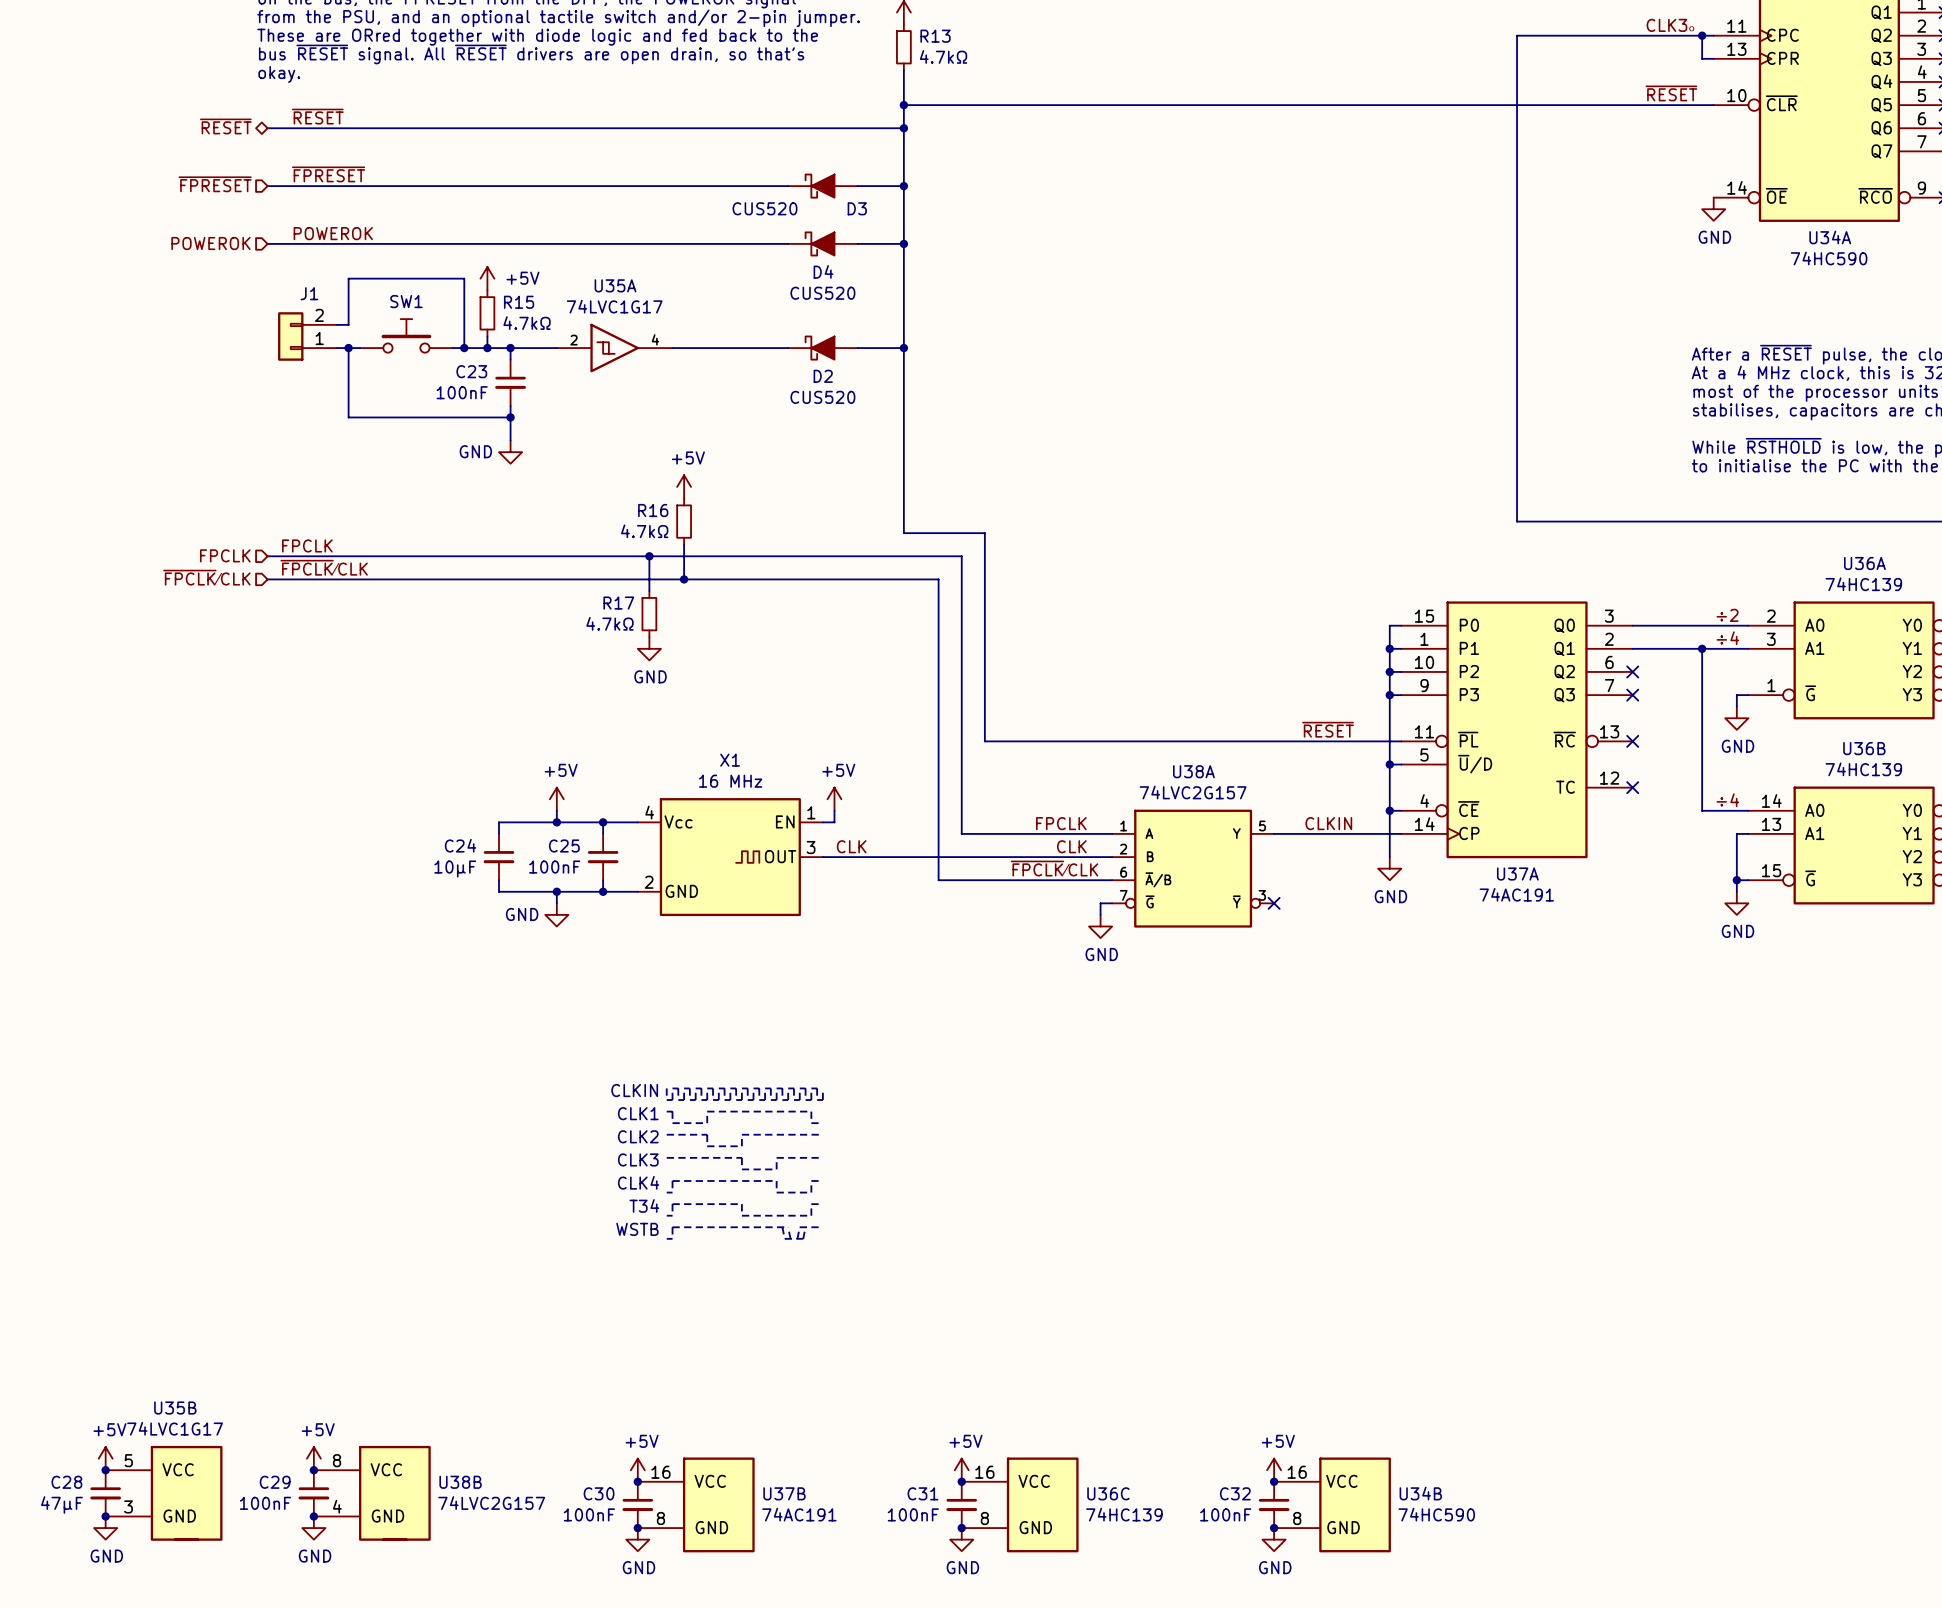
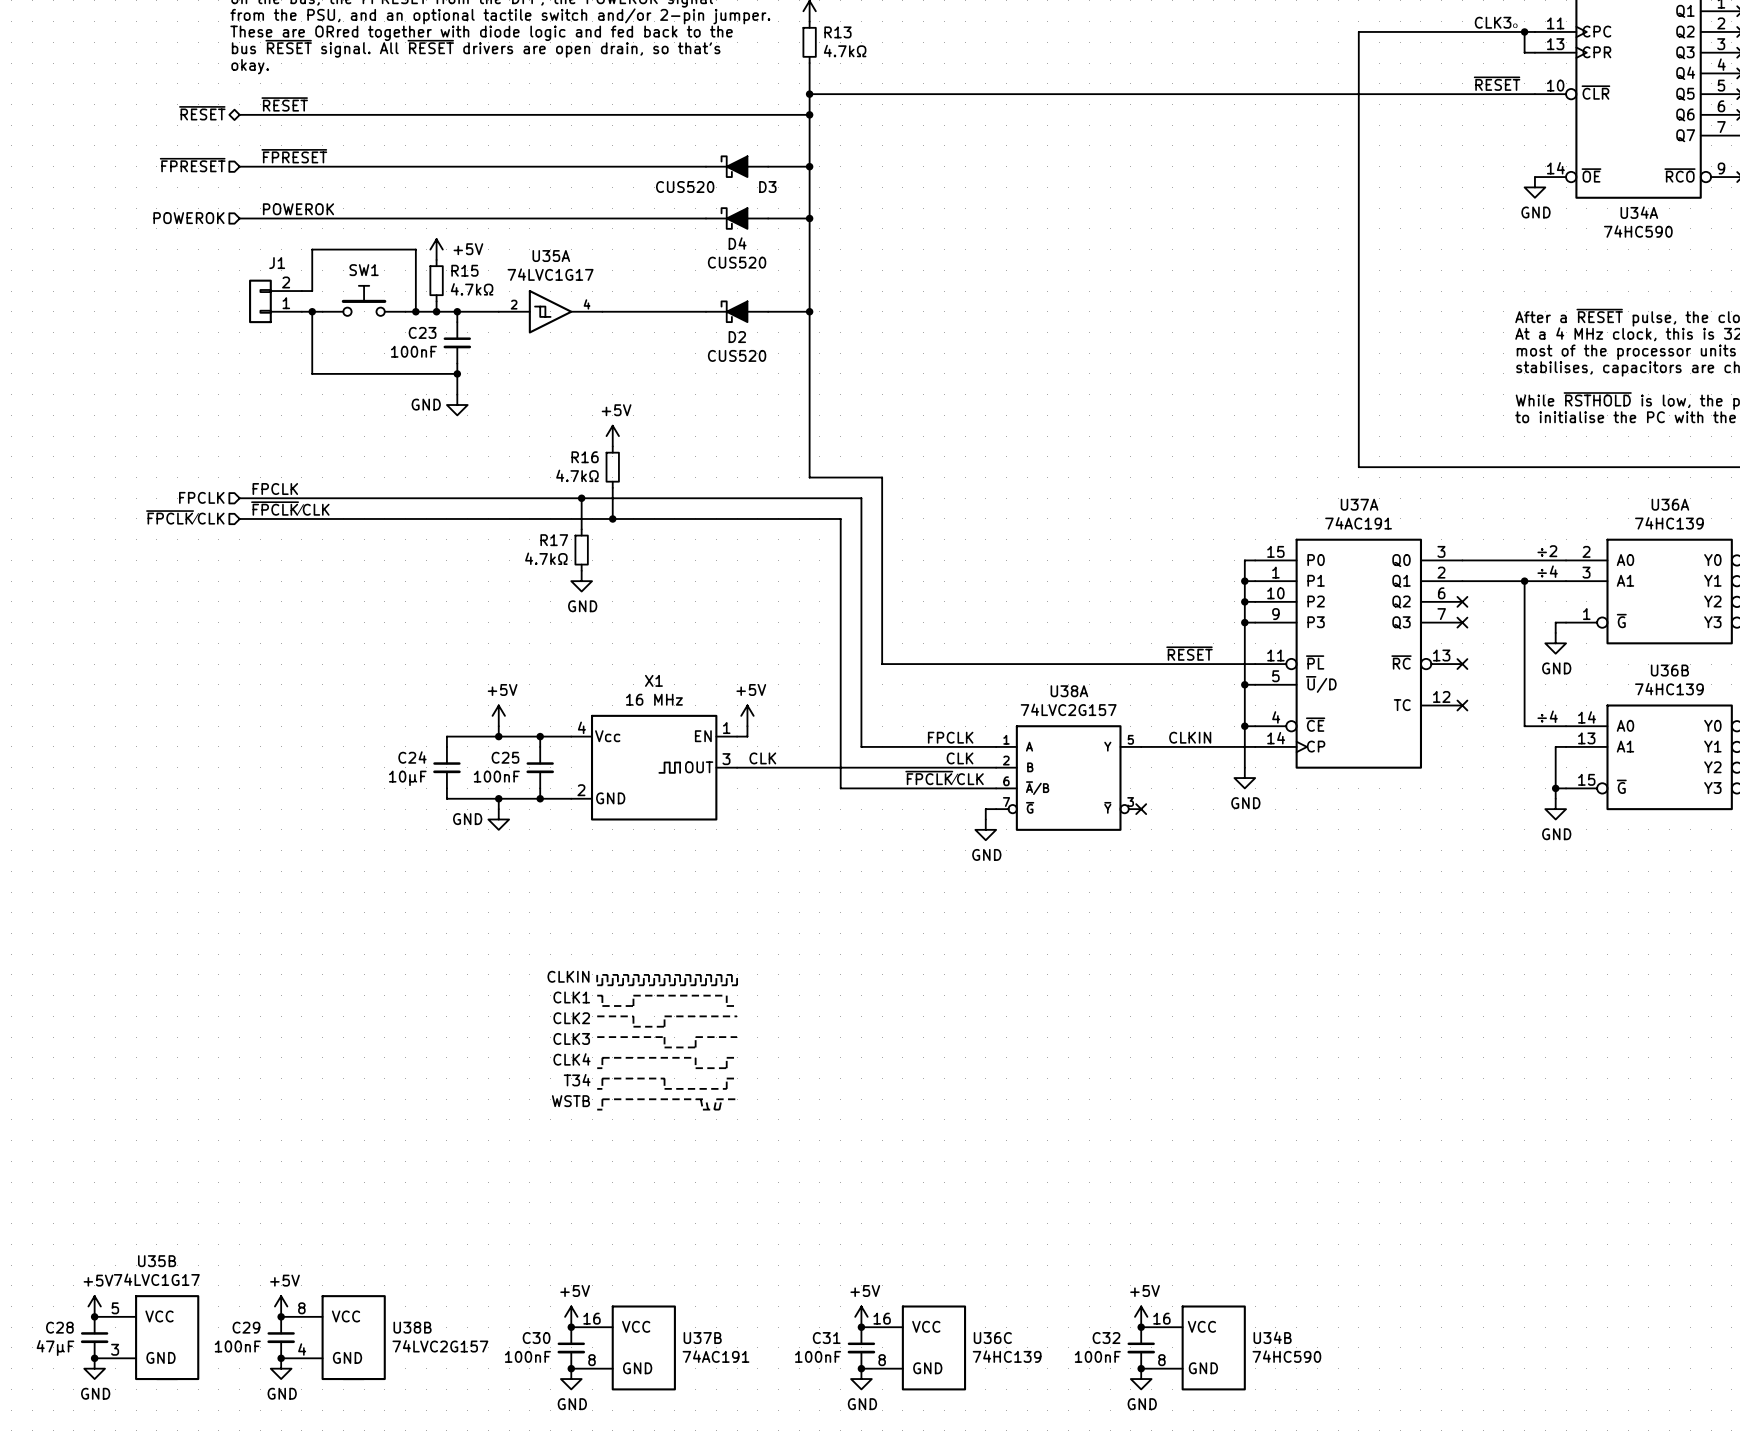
U37A name position: U37A (1517, 873) -> U37A (1359, 504)
U37A value position: 74AC191 (1516, 894) -> 74AC191 (1358, 523)

